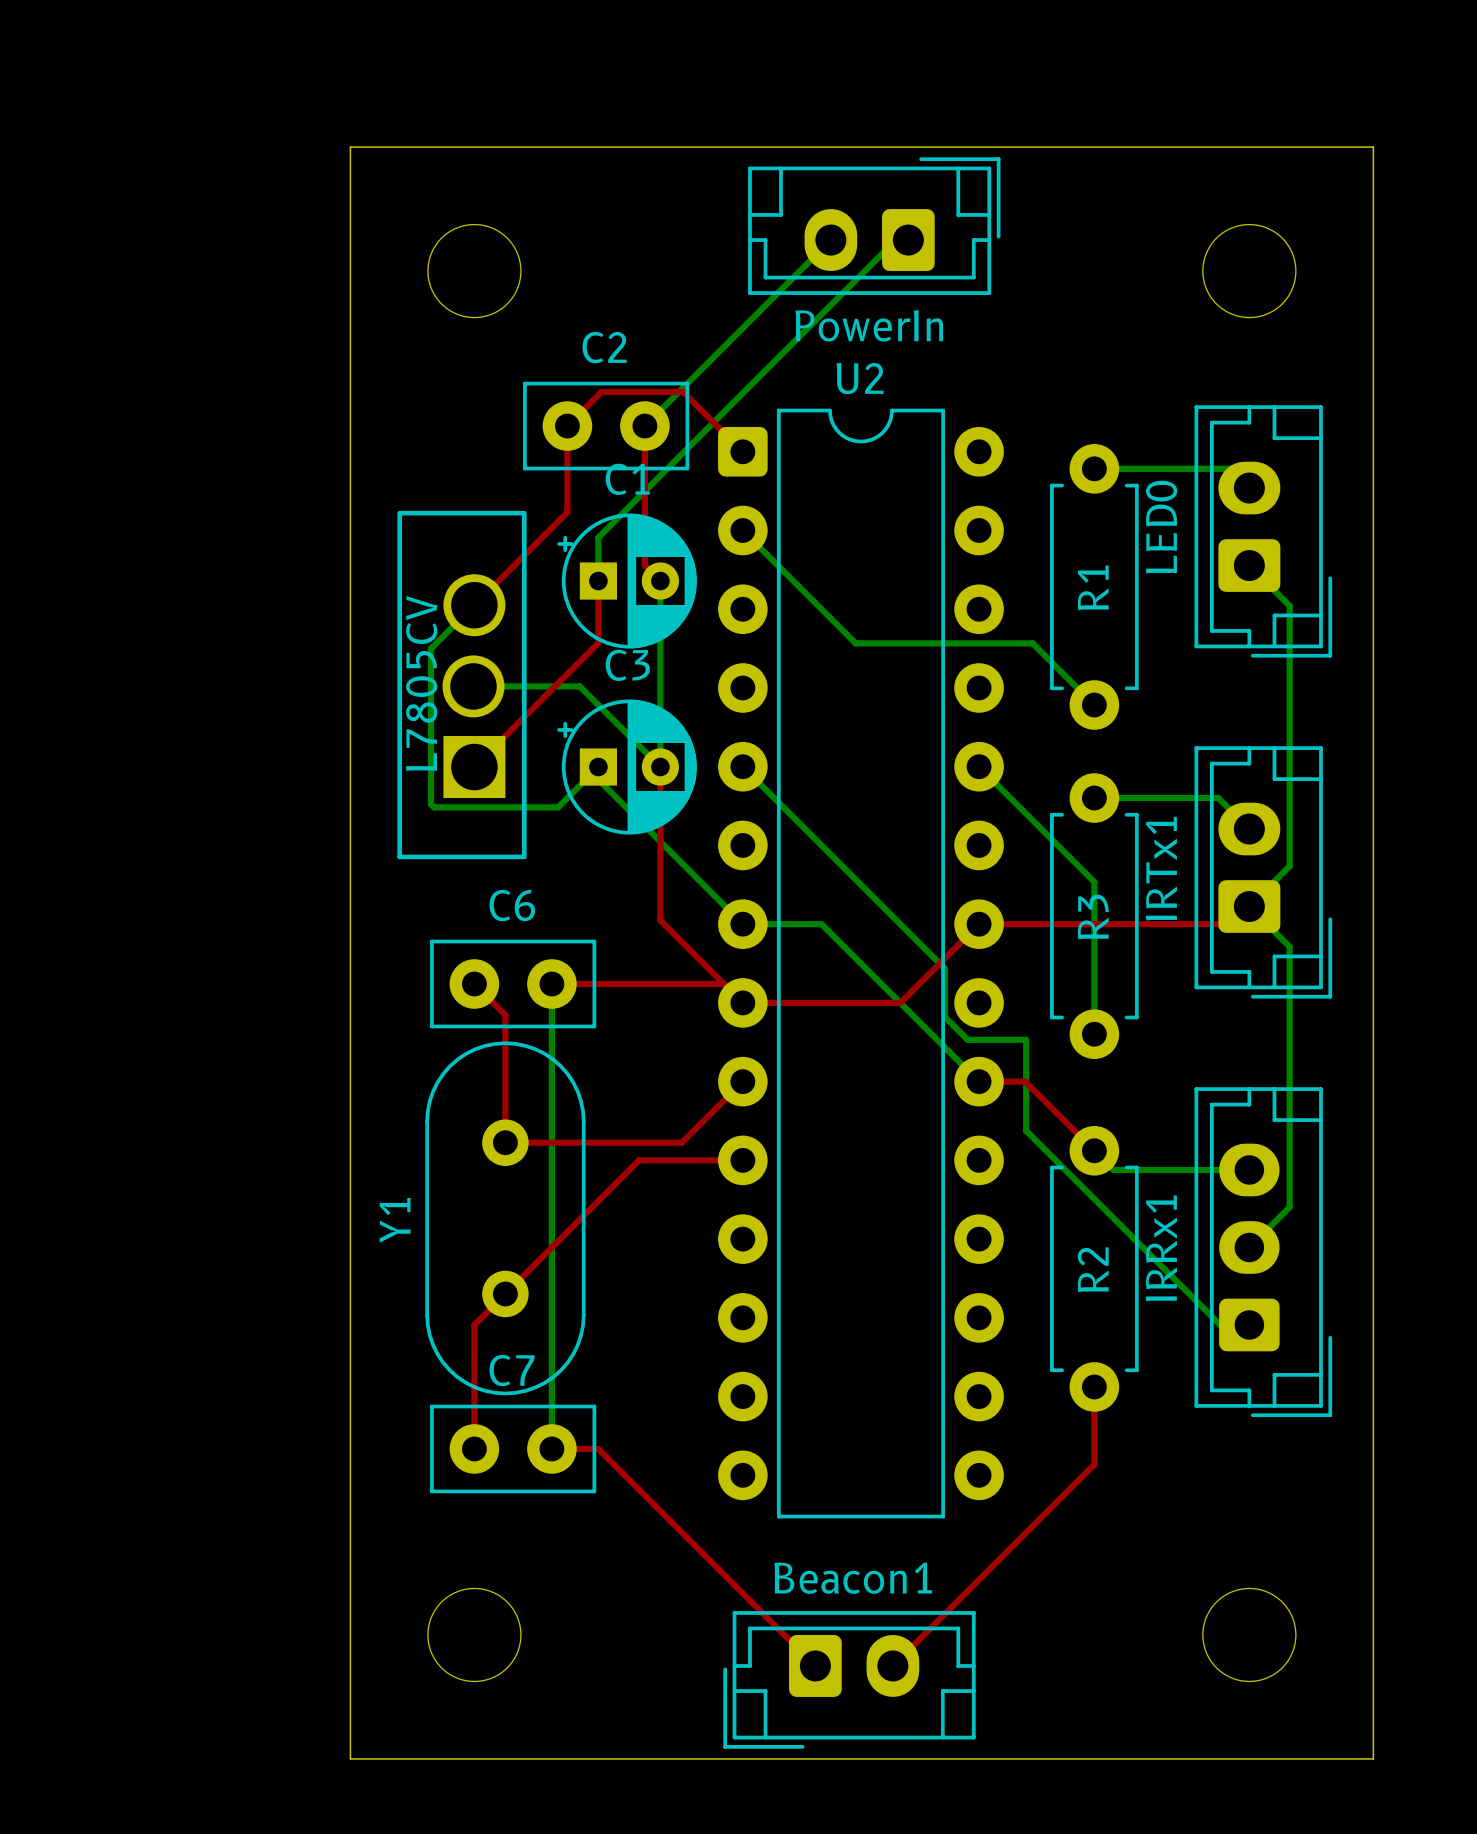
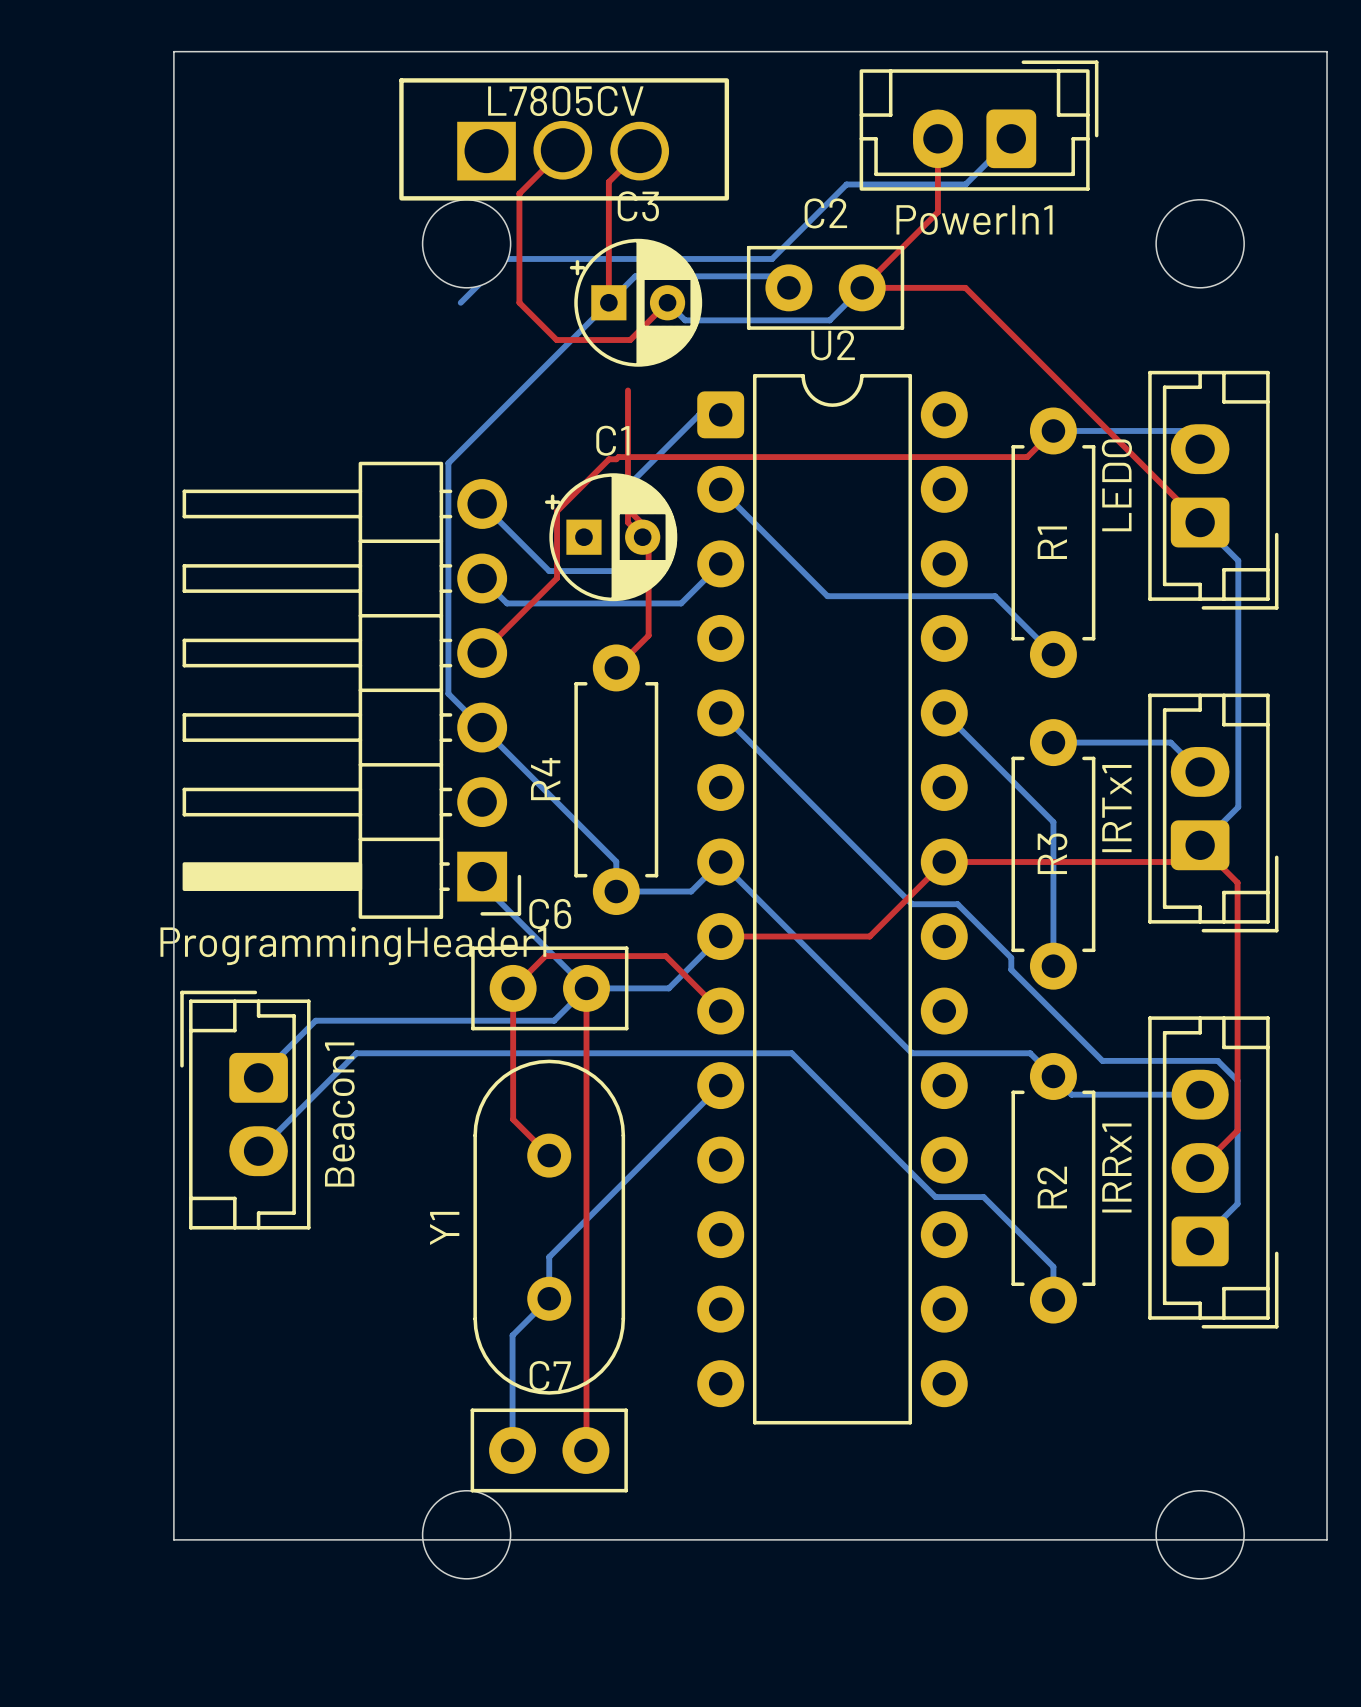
PowerIn1: none -> (979, 125)
board edge: (350, 147) (1373, 147) (1373, 1758) (350, 1758) (350, 147) -> (173, 51) (173, 1539) (1327, 1539) (1327, 51) (173, 51)
top track: none -> (937, 138) (937, 212) (862, 287) (965, 287) (1200, 522)
bottom track: none -> (1011, 138) (965, 184) (846, 184) (772, 258) (504, 258) (460, 302)
top track: none -> (562, 150) (519, 193) (519, 302) (556, 340) (630, 340) (667, 302)
top track: none -> (639, 151) (608, 181) (608, 302)
PowerIn: (874, 226) -> none
bottom track: (830, 240) (644, 426) -> none
bottom track: (908, 240) (895, 240) (598, 537) (598, 581) -> none
bottom track: none -> (788, 287) (777, 276) (635, 276) (448, 463) (448, 693) (616, 861) (616, 891) (691, 891) (720, 862) (911, 1053) (1030, 1053) (1053, 1076)
bottom track: none -> (862, 287) (829, 320) (685, 320) (667, 302)
C2 position: (606, 426) -> (825, 287)
bottom track: none -> (720, 414) (699, 414) (616, 497)
top track: (734, 460) (742, 451) (683, 391) (601, 391) (567, 426) (567, 512) (474, 605) -> none
top track: none -> (1053, 430) (1027, 457) (618, 457) (616, 459) (609, 459) (557, 511) (557, 578) (482, 653)
top track: none -> (616, 497) (648, 530) (648, 635) (616, 667)
bottom track: none -> (482, 503) (549, 571) (616, 571)
top track: (598, 581) (598, 643) (474, 767) -> none
bottom track: (660, 581) (660, 767) (579, 686) (473, 686) -> none
bottom track: (474, 605) (431, 648) (431, 804) (434, 807) (558, 807) (598, 767) (598, 779) (742, 924) (821, 924) (979, 1081) -> none
bottom track: none -> (720, 563) (681, 603) (507, 603) (482, 578)
part rotation: 0° (462, 685) -> 90° clockwise (564, 139)
part position: (462, 685) -> (564, 139)
ProgrammingHeader1: none -> (351, 690)
C3 position: (627, 767) -> (636, 302)
top track: (660, 767) (660, 920) (742, 1002) -> none
R4: none -> (616, 779)
top track: none -> (1200, 845) (1237, 882) (1237, 1130) (1200, 1168)
bottom track: (1249, 906) (1289, 946) (1289, 1207) (1249, 1247) -> none
bottom track: none -> (482, 876) (482, 884) (586, 988)
bottom track: (944, 968) (944, 1017) (967, 1039) (1026, 1039) (1026, 1130) (1220, 1324) (1249, 1324) -> (911, 904) (957, 904) (1011, 957) (1011, 969) (1102, 1060) (1217, 1060) (1237, 1080) (1237, 1203) (1200, 1241)
top track: (474, 984) (505, 1015) (505, 1142) (681, 1142) (742, 1081) -> (549, 1155) (513, 1119) (513, 988) (545, 956) (665, 956) (720, 1011)
C6 position: (513, 984) -> (549, 988)
top track: (551, 984) (723, 984) -> none
bottom track: (551, 984) (551, 1448) -> none
bottom track: none -> (720, 936) (668, 988) (586, 988)
top track: none -> (586, 988) (585, 1450)
bottom track: none -> (586, 988) (554, 1020) (315, 1020) (258, 1077)
top track: (979, 1081) (1025, 1081) (1094, 1150) -> none
top track: (742, 1160) (639, 1160) (474, 1324) (474, 1448) -> none
bottom track: none -> (720, 1085) (549, 1257) (549, 1298) (512, 1335) (512, 1450)
Y1 position: (505, 1218) -> (549, 1227)
bottom track: none -> (258, 1151) (356, 1053) (791, 1053) (935, 1197) (983, 1197) (1053, 1266) (1053, 1300)
top track: (1094, 1386) (1094, 1464) (892, 1665) -> none
C7 position: (513, 1448) -> (549, 1450)
top track: (551, 1448) (598, 1448) (815, 1665) -> none
Beacon1 rotation: 0° (849, 1679) -> 90° clockwise (245, 1110)
Beacon1 position: (849, 1679) -> (245, 1110)

